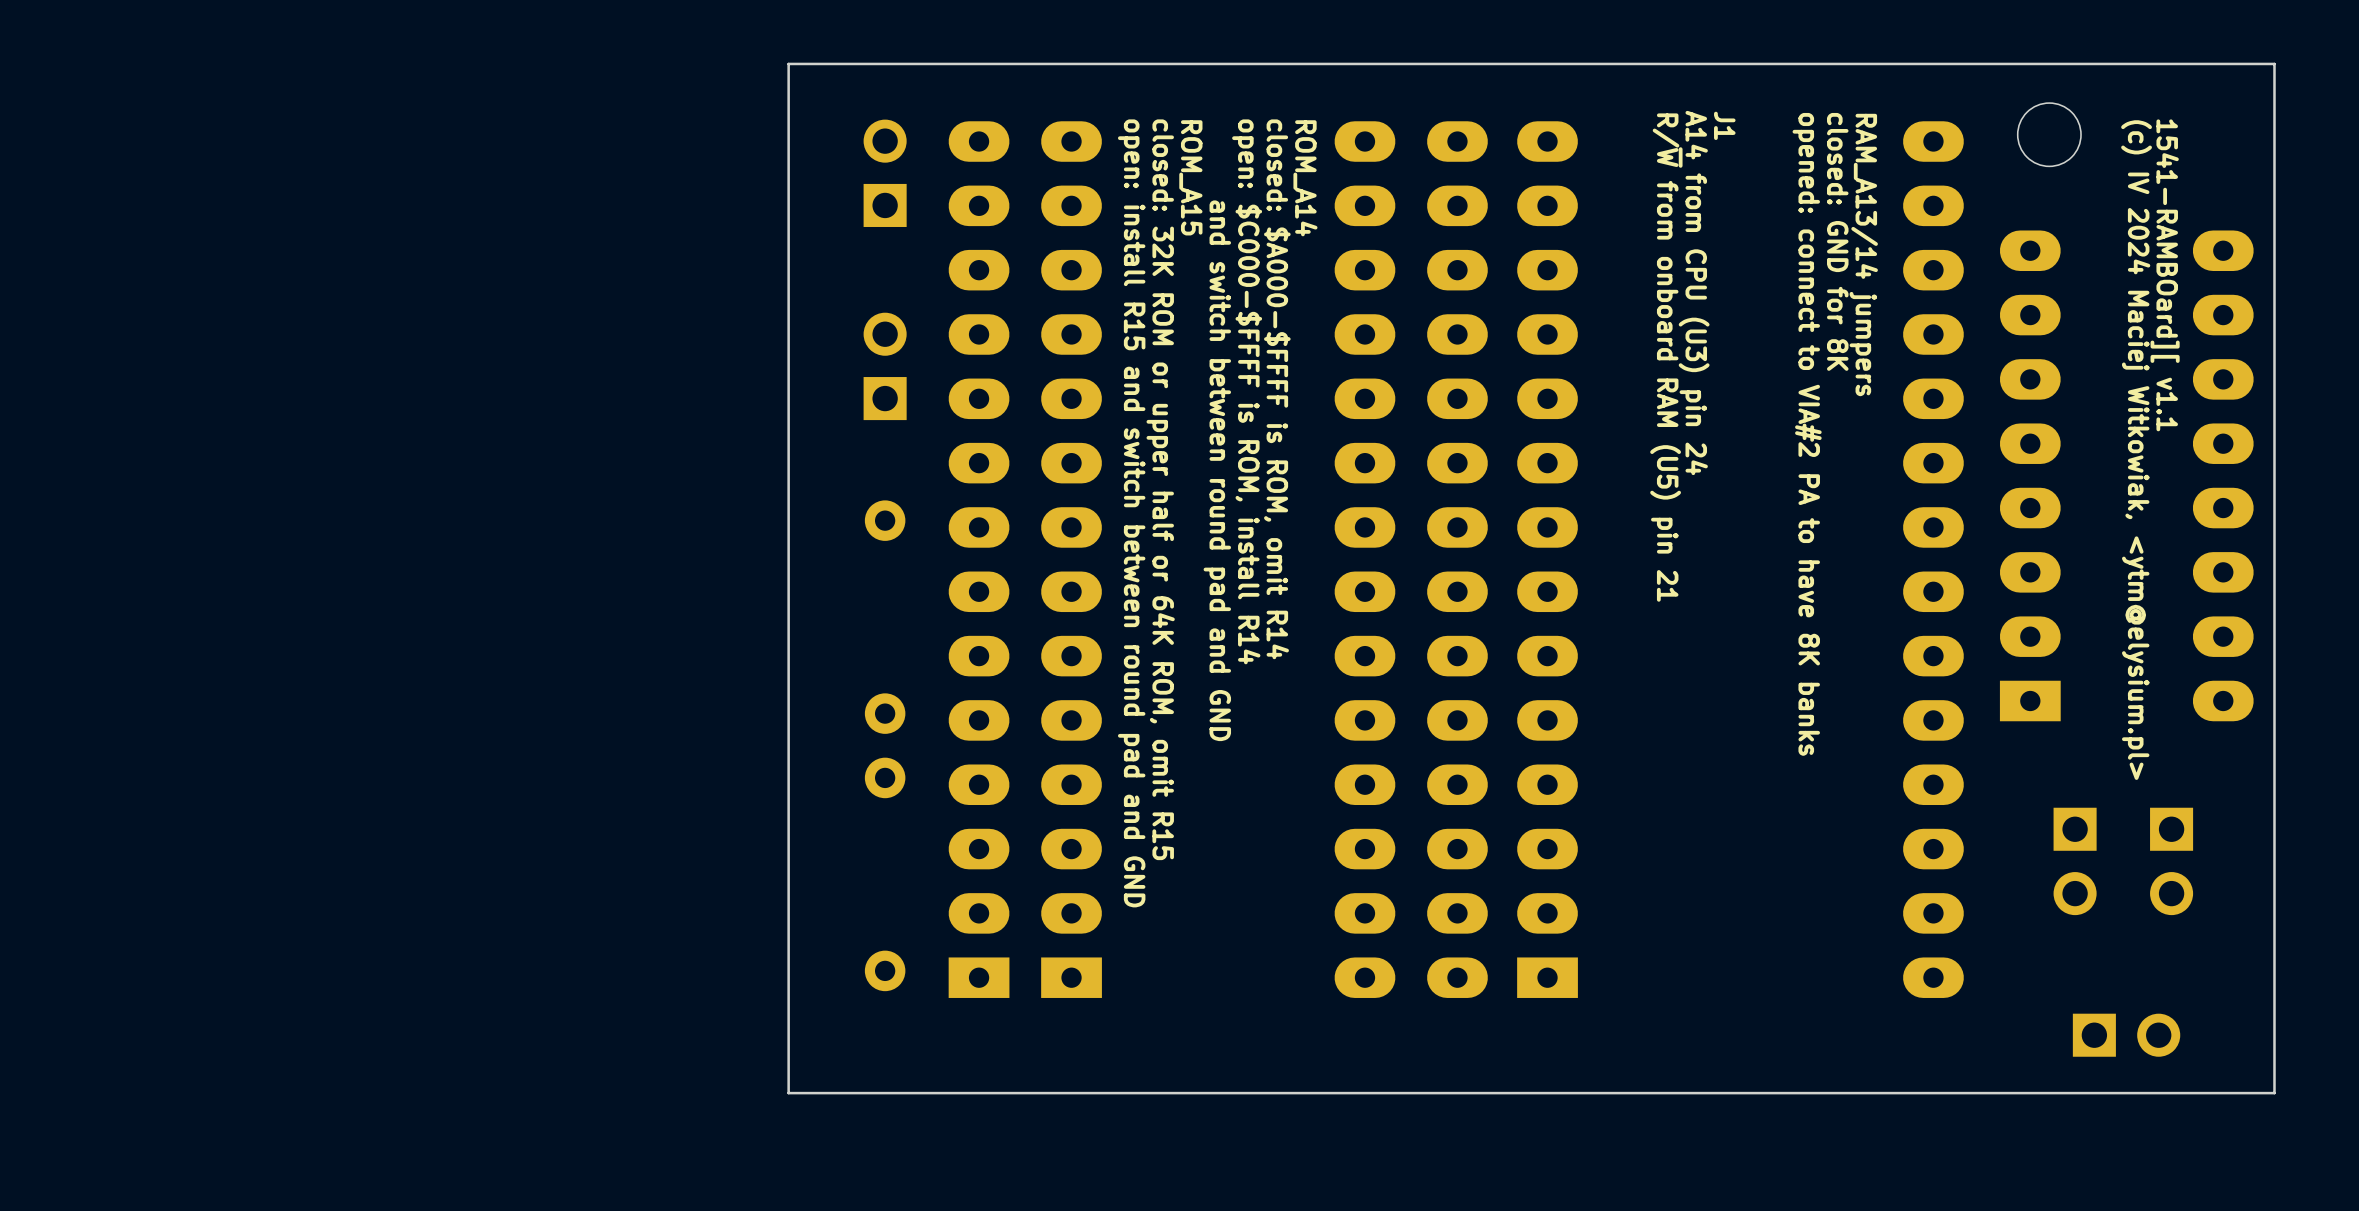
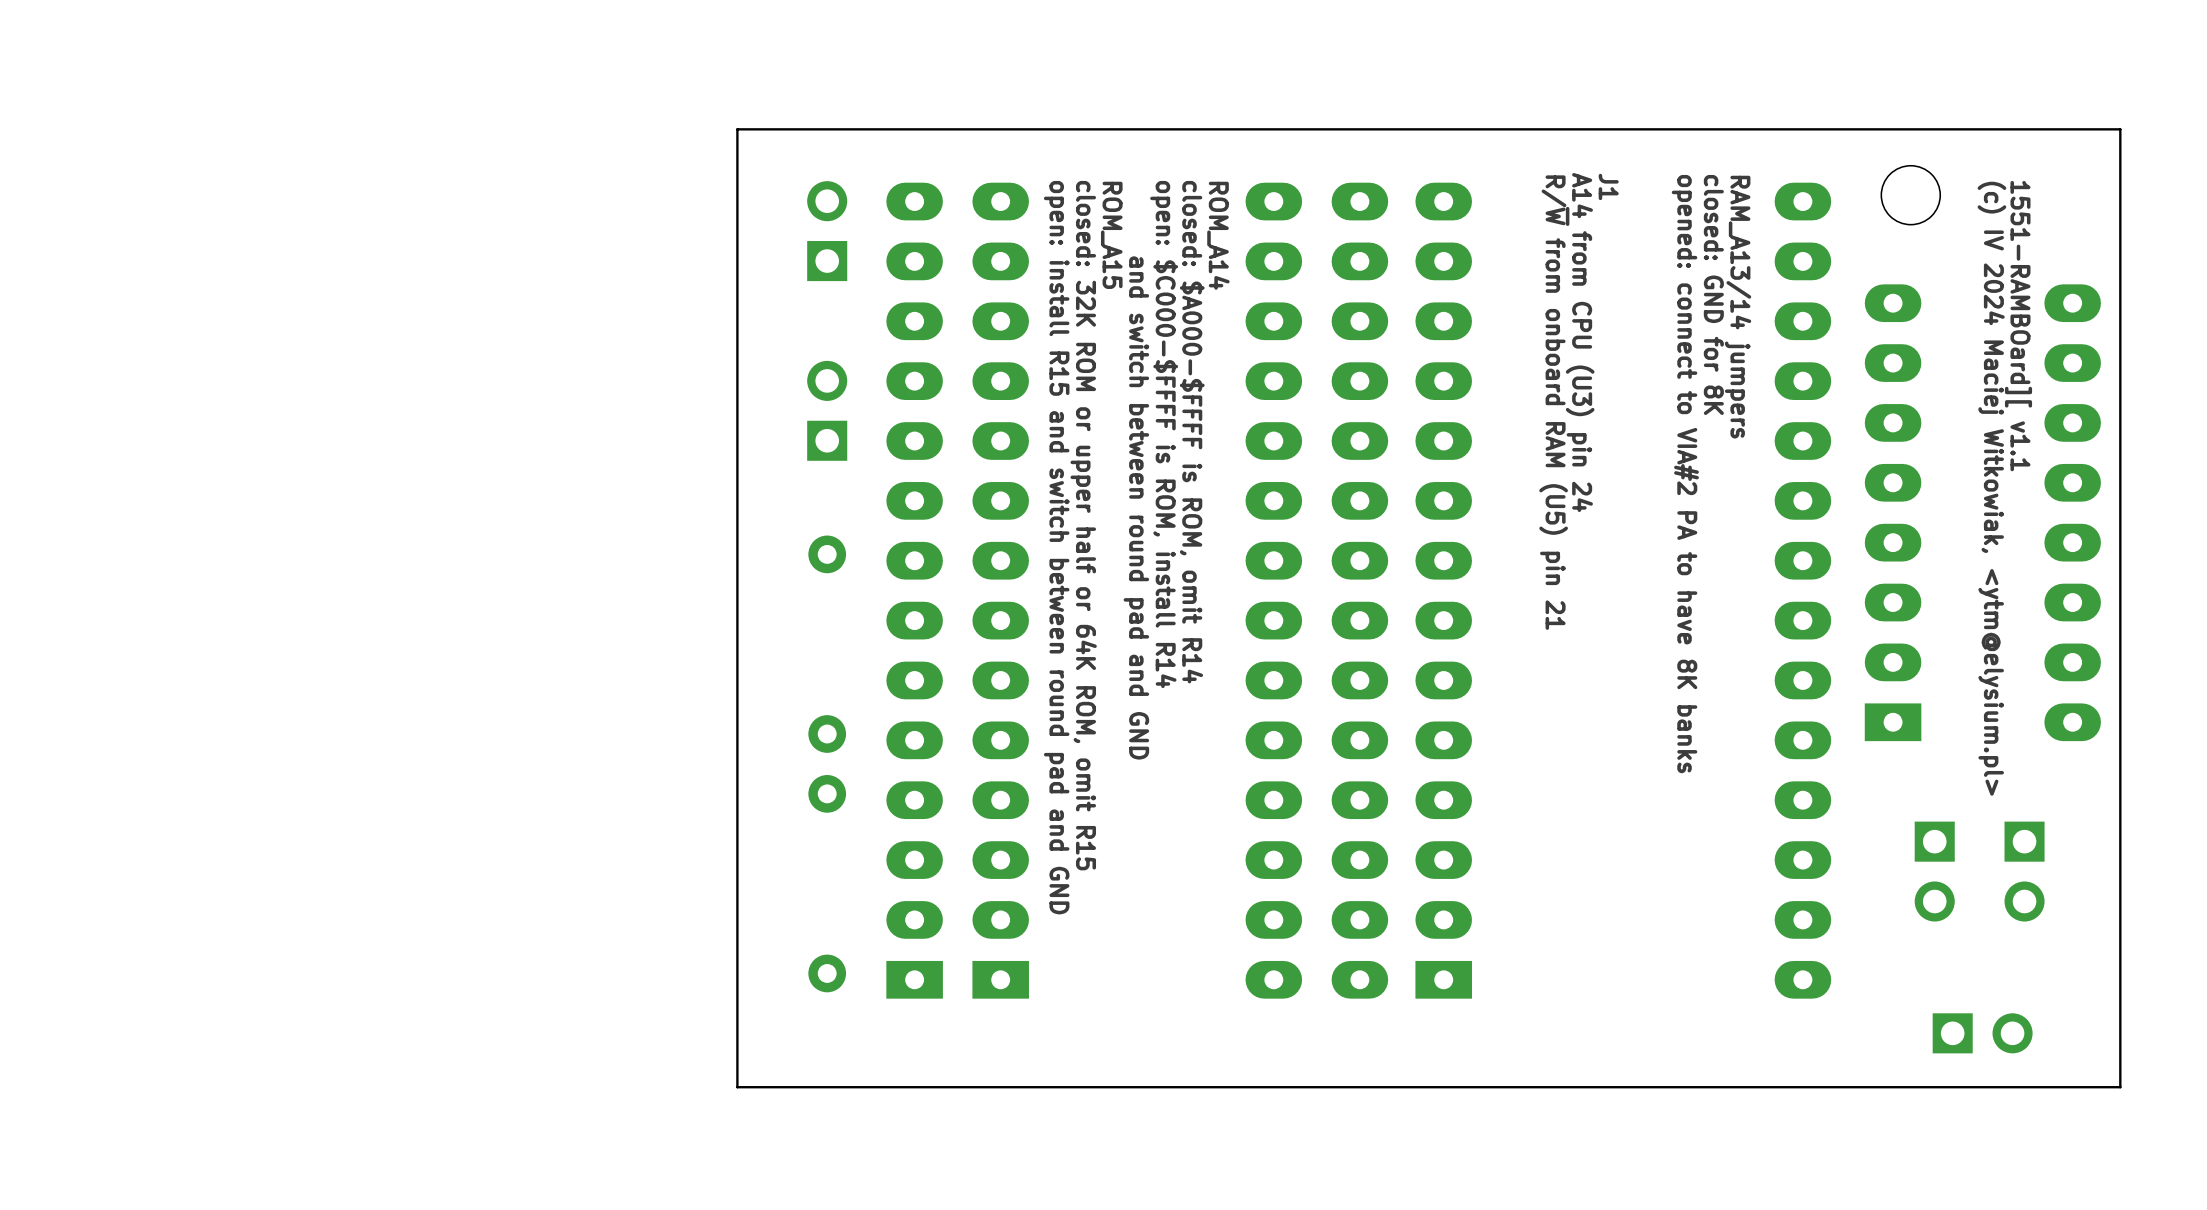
text: 1541-RAMBOard][ v1.1 (2165, 275) -> 1551-RAMBOard][ v1.1 (2018, 326)

